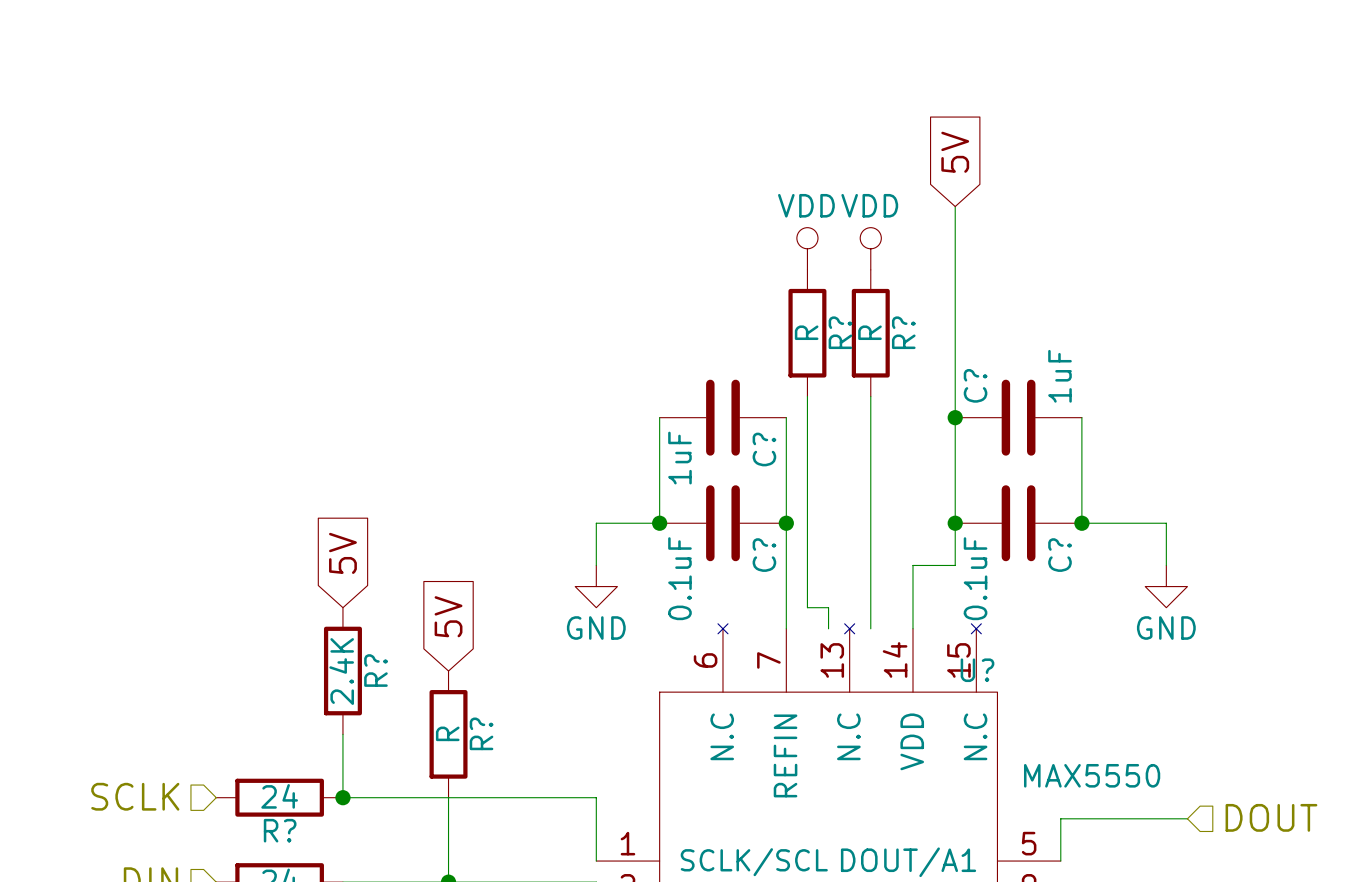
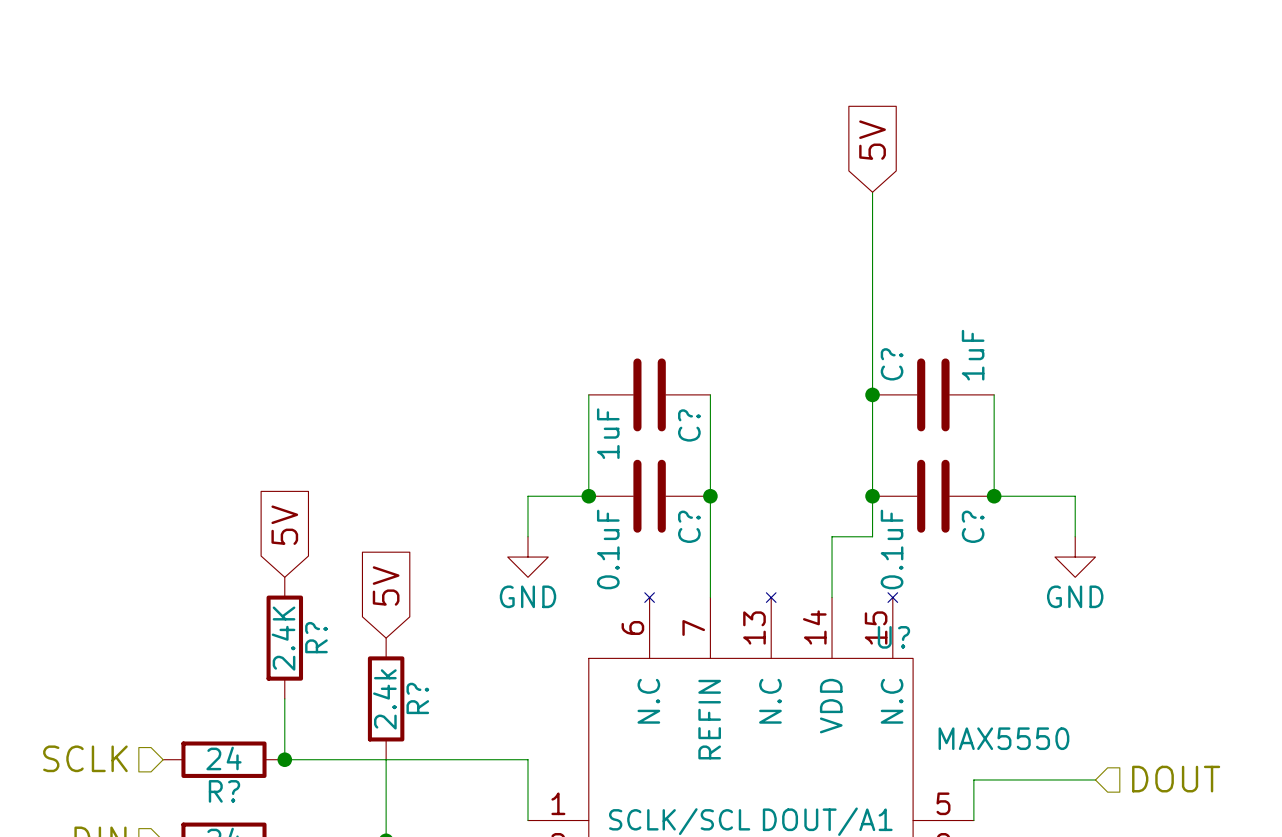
power symbol: VDD (807, 248) -> none
power symbol: VDD (870, 248) -> none
R?: R (807, 333) -> none
R?: R (870, 333) -> none
wire: (807, 396) (807, 607) (828, 607) (828, 628) -> none
wire: (870, 396) (870, 628) -> none
R? value: R (447, 733) -> 2.4k (384, 699)

